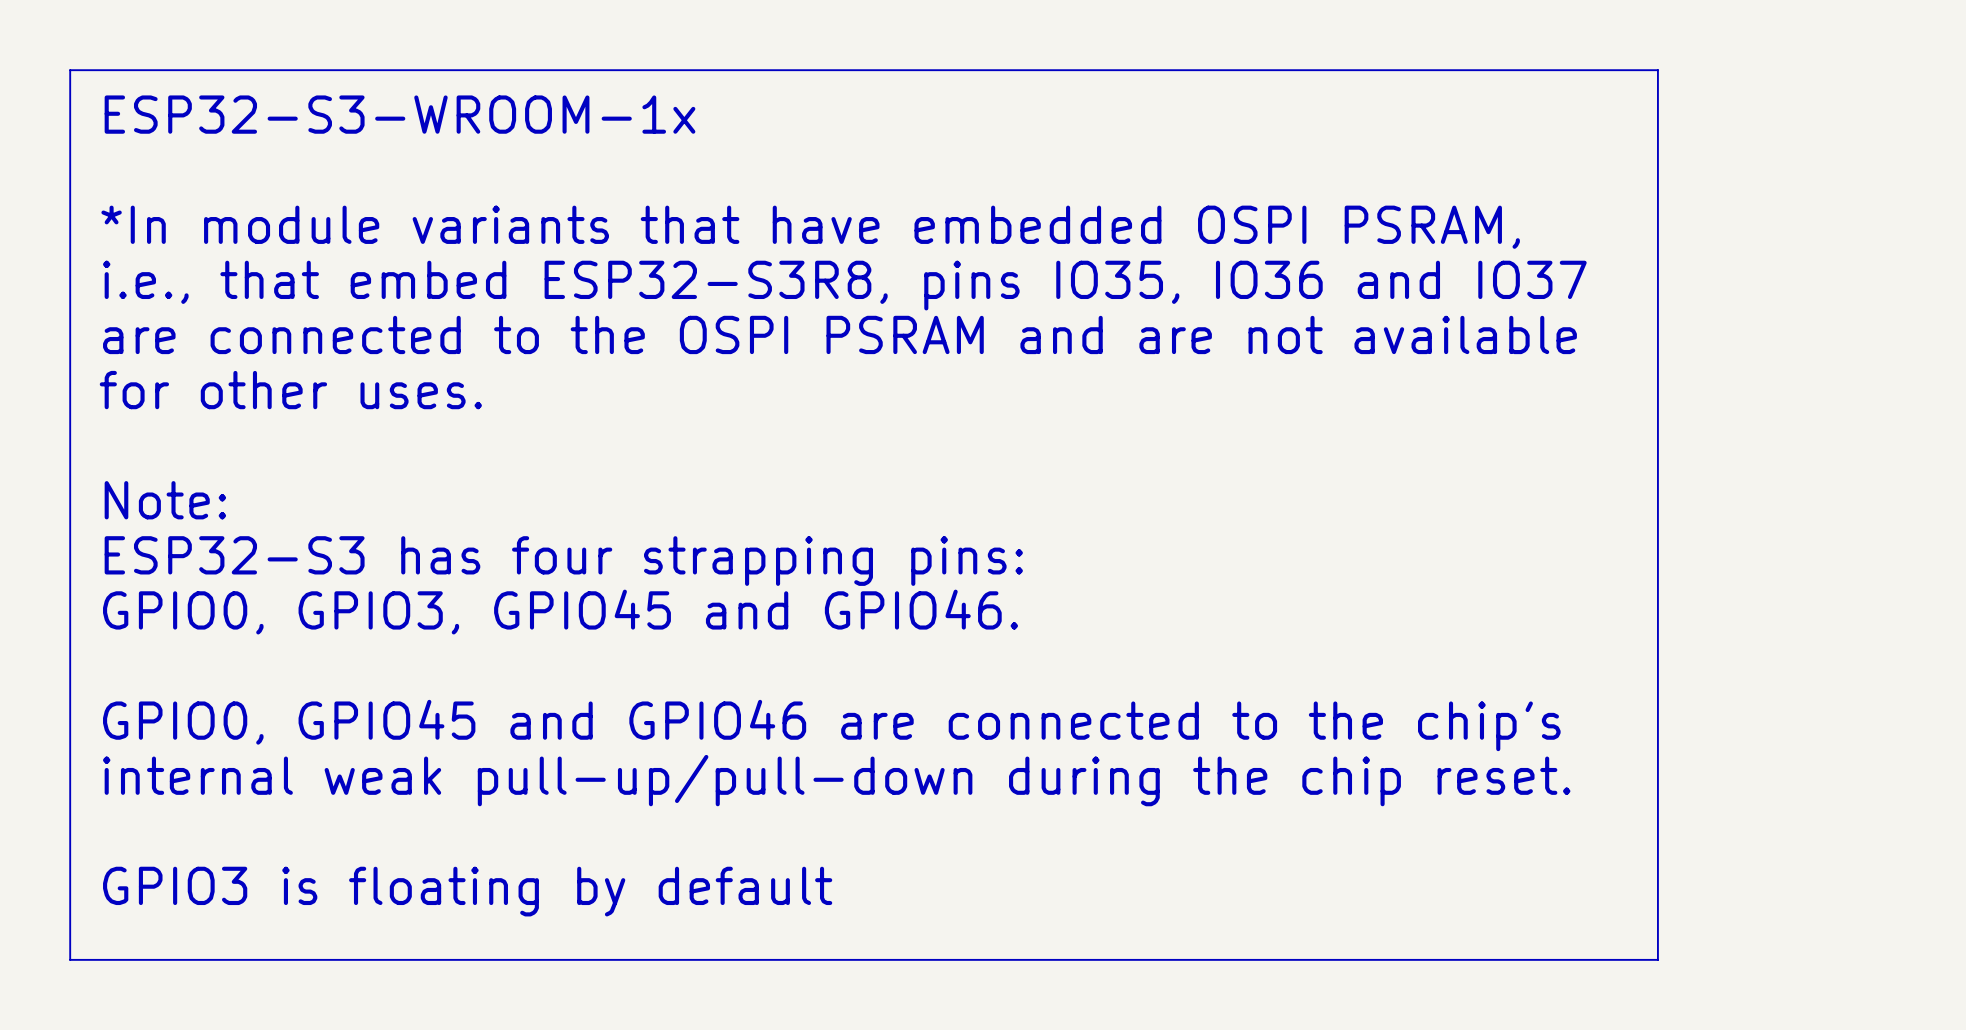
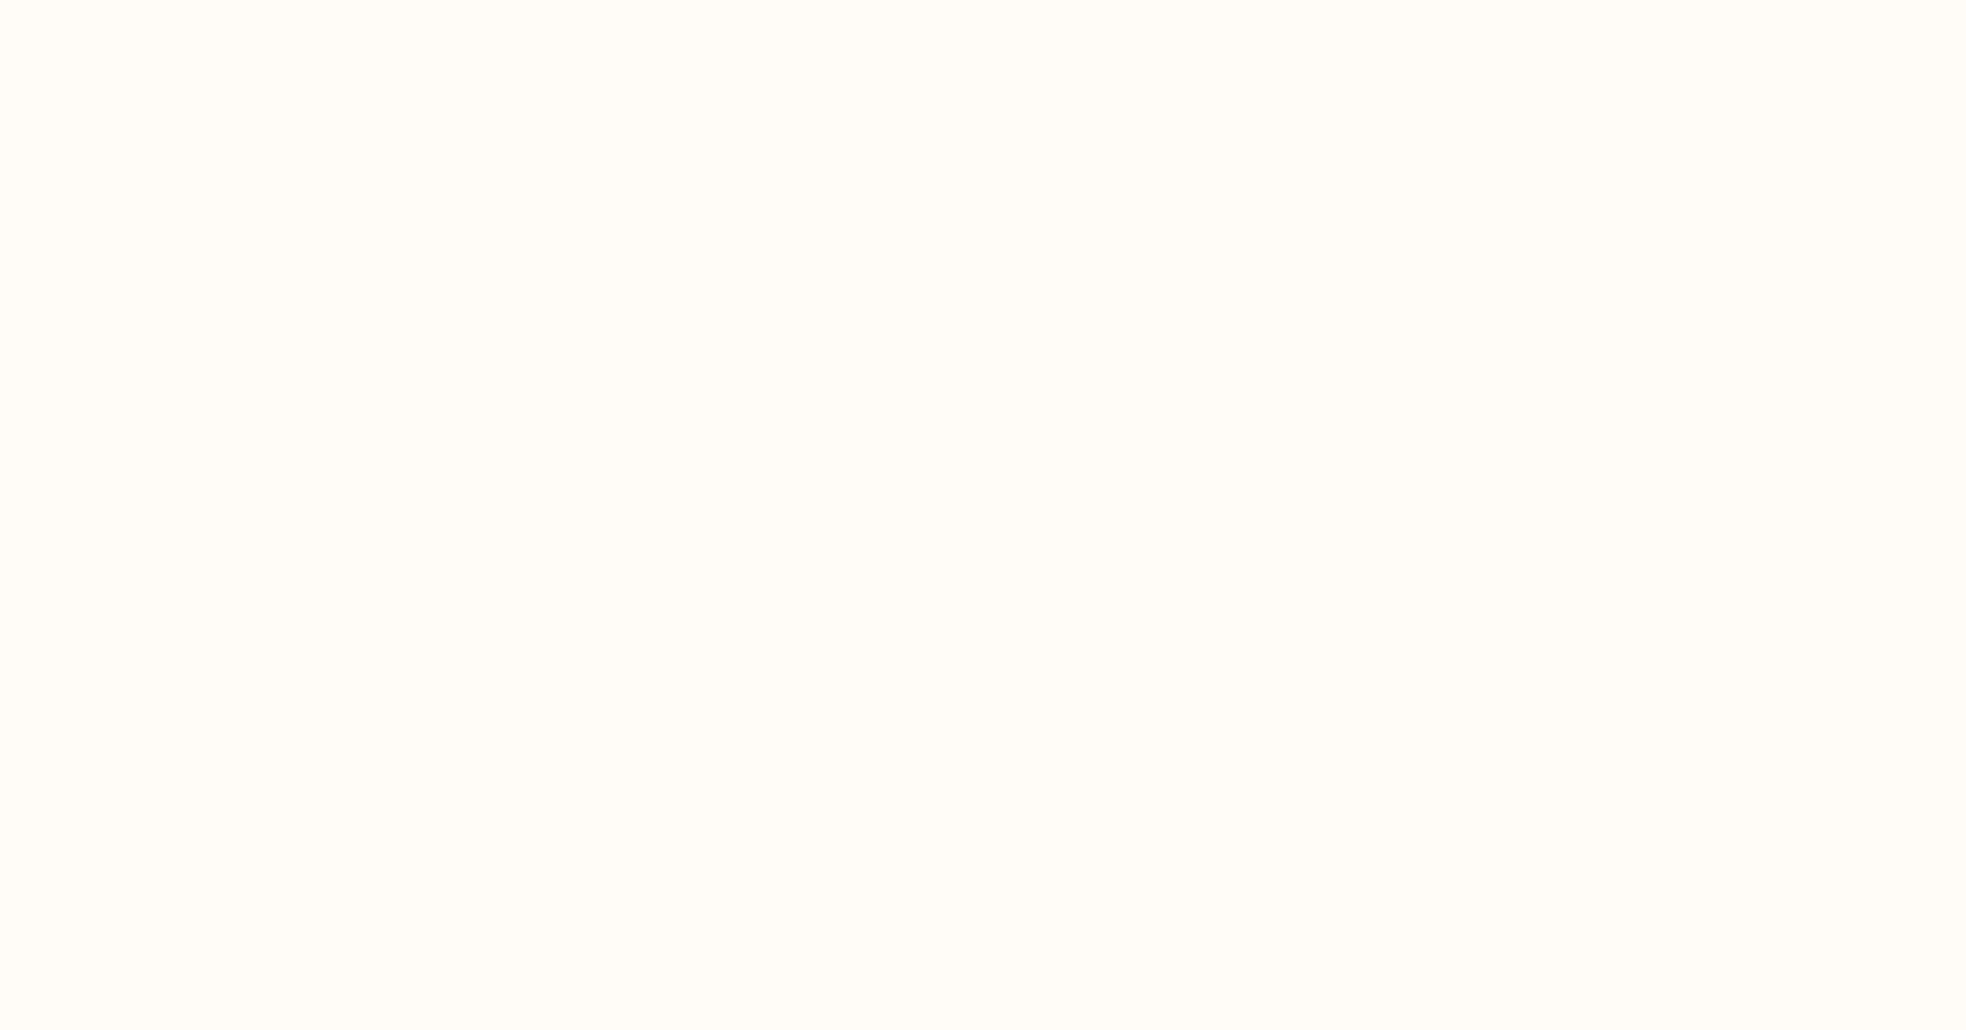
line: (70, 70) (1657, 70) (1657, 959) (70, 959) (70, 70) -> none
text: ESP32-S3-WROOM-1x (400, 114) -> none
text: *In module variants that have embedded OSPI PSRAM, (810, 227) -> none
text: i.e., that embed ESP32-S3R8, pins IO35, IO36 and IO37 (844, 285) -> none
text: are connected to the OSPI PSRAM and are not available (839, 334) -> none
text: for other uses. (290, 390) -> none
text: Note: (165, 500) -> none
text: ESP32-S3 has four strapping pins: (563, 561) -> none
text: GPIO0, GPIO3, GPIO45 and GPIO46. (560, 612) -> none
text: GPIO0, GPIO45 and GPIO46 are connected to the chip's (831, 725) -> none
text: internal weak pull-up/pull-down during the chip reset. (836, 780) -> none
text: GPIO3 is floating by default (467, 891) -> none

